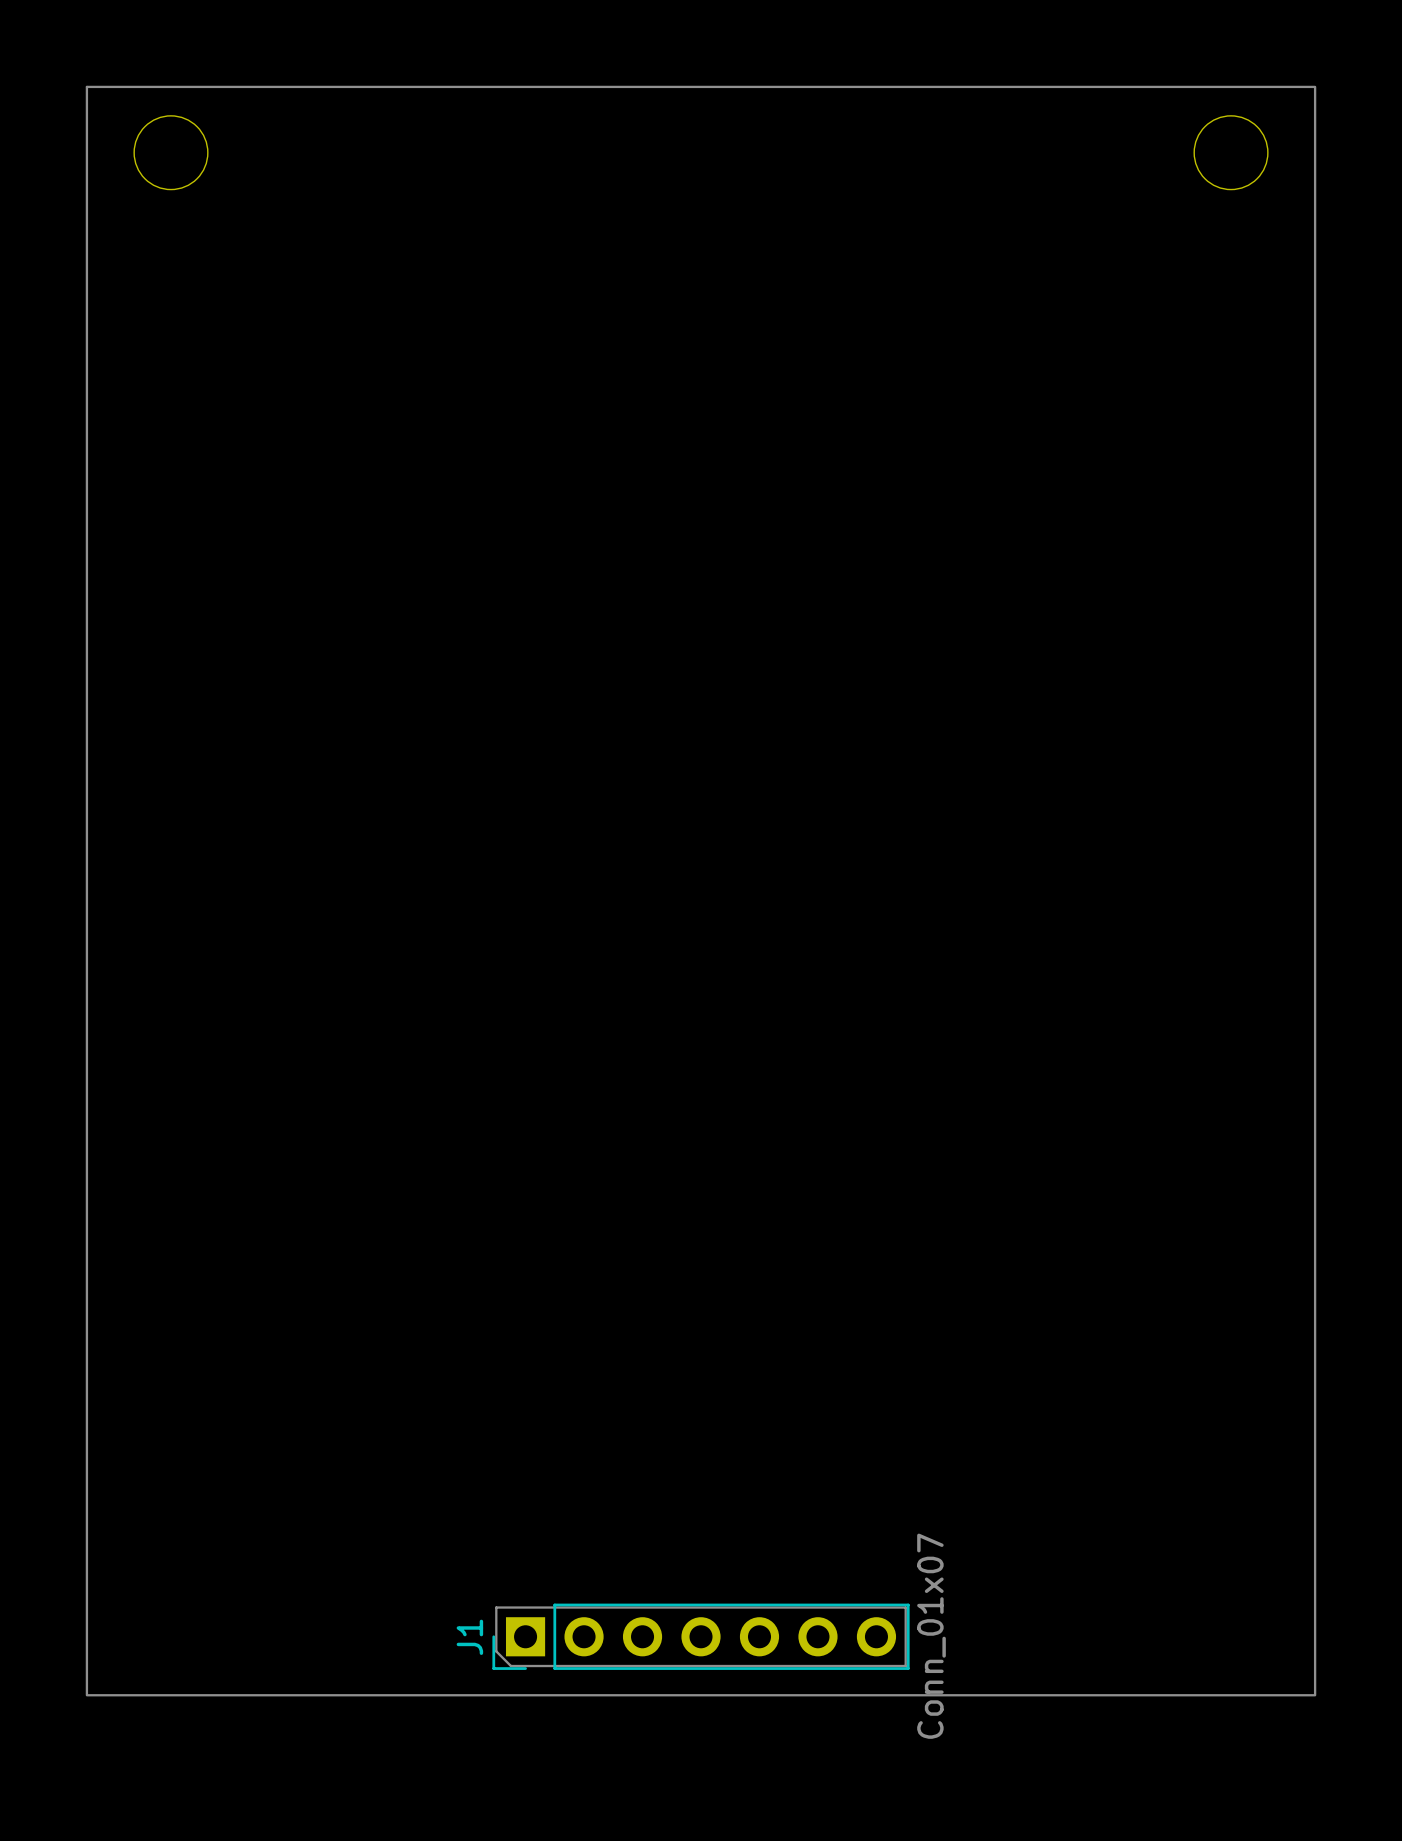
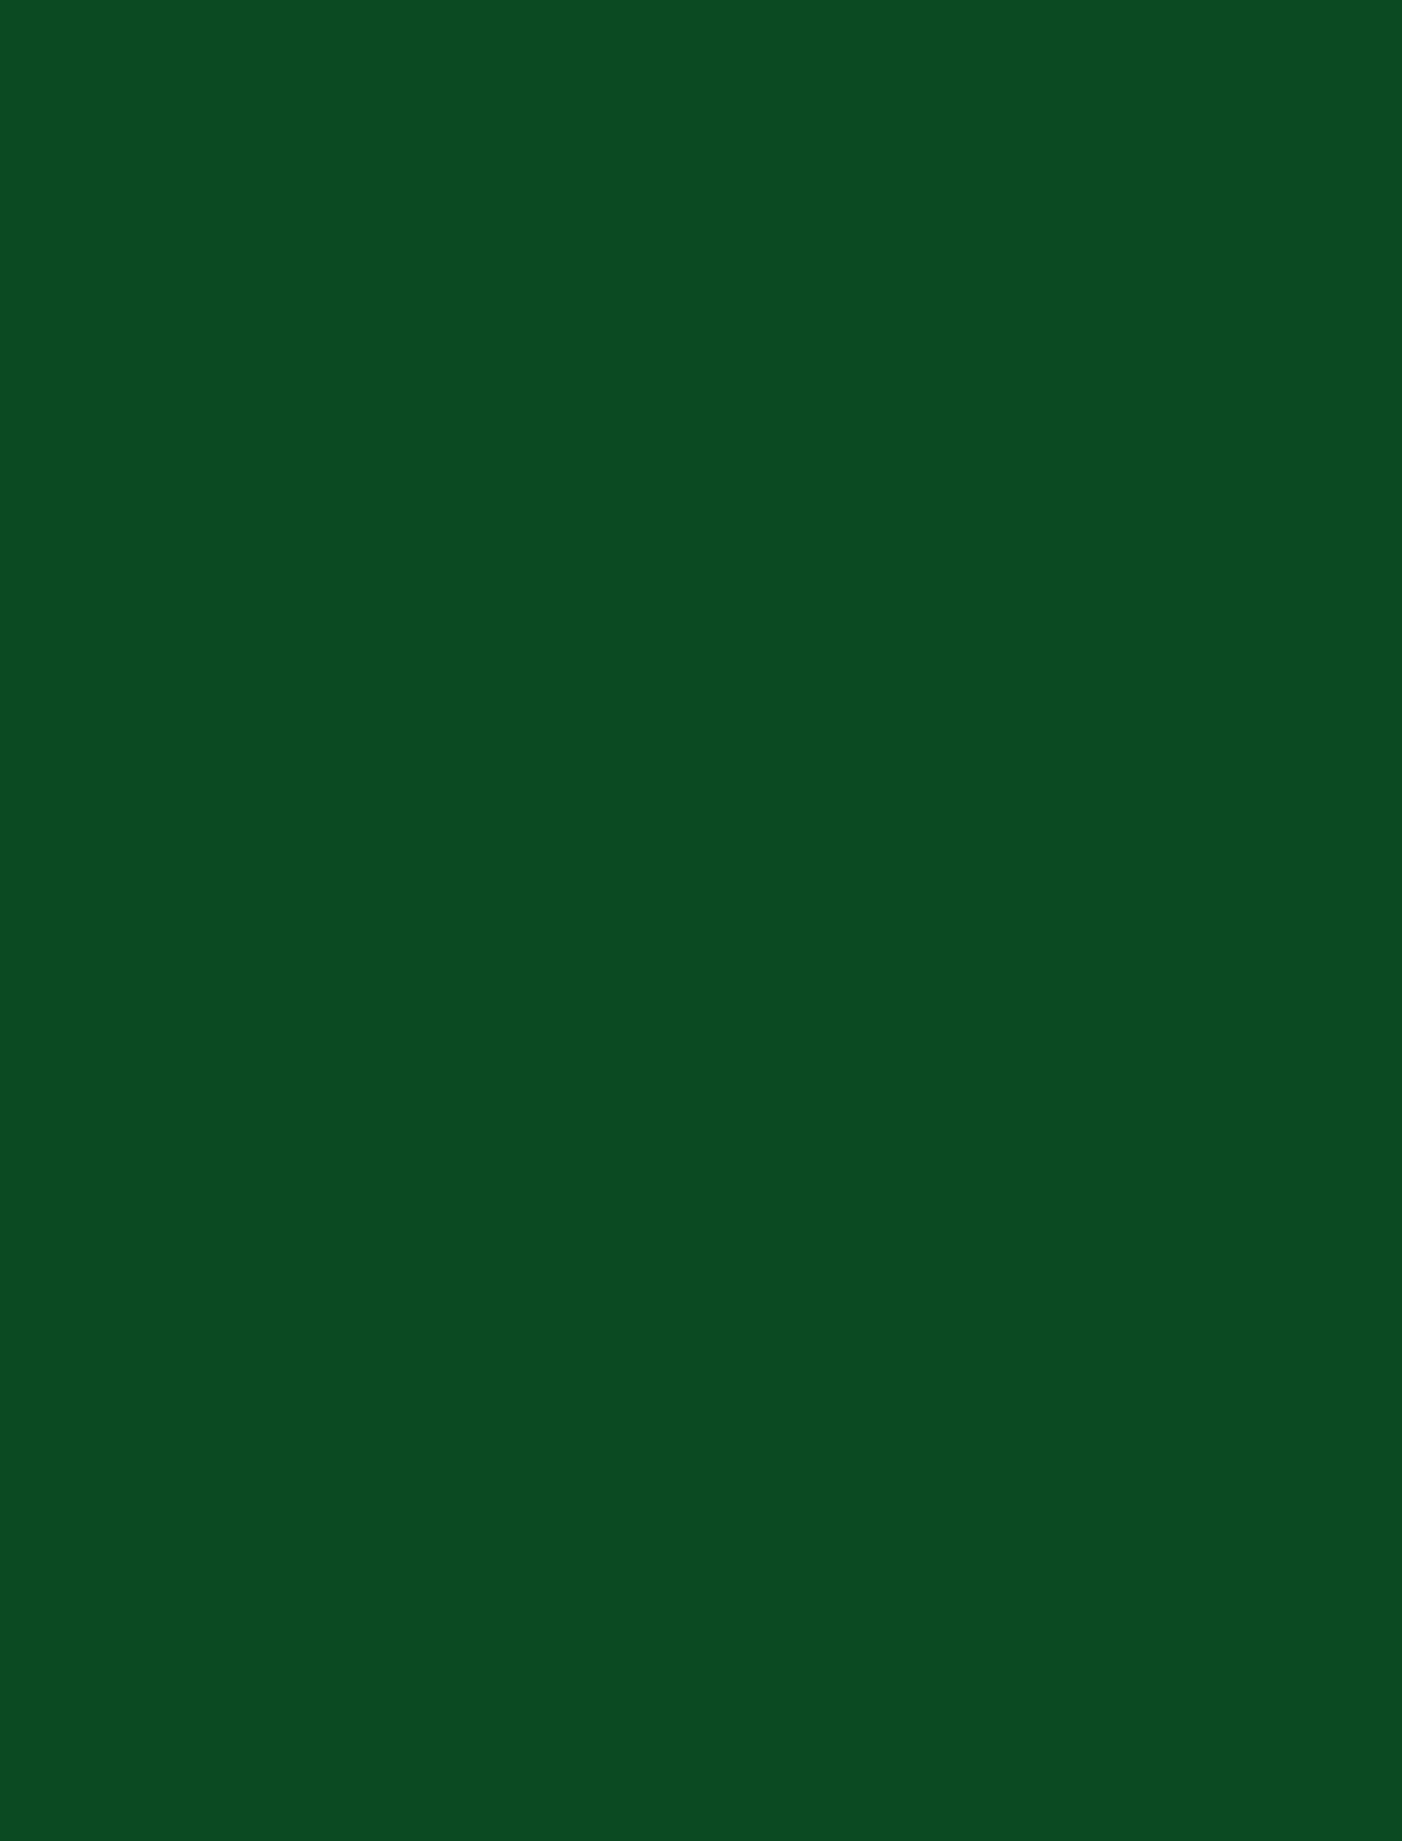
J1: Conn_01x07 (701, 891) -> none

